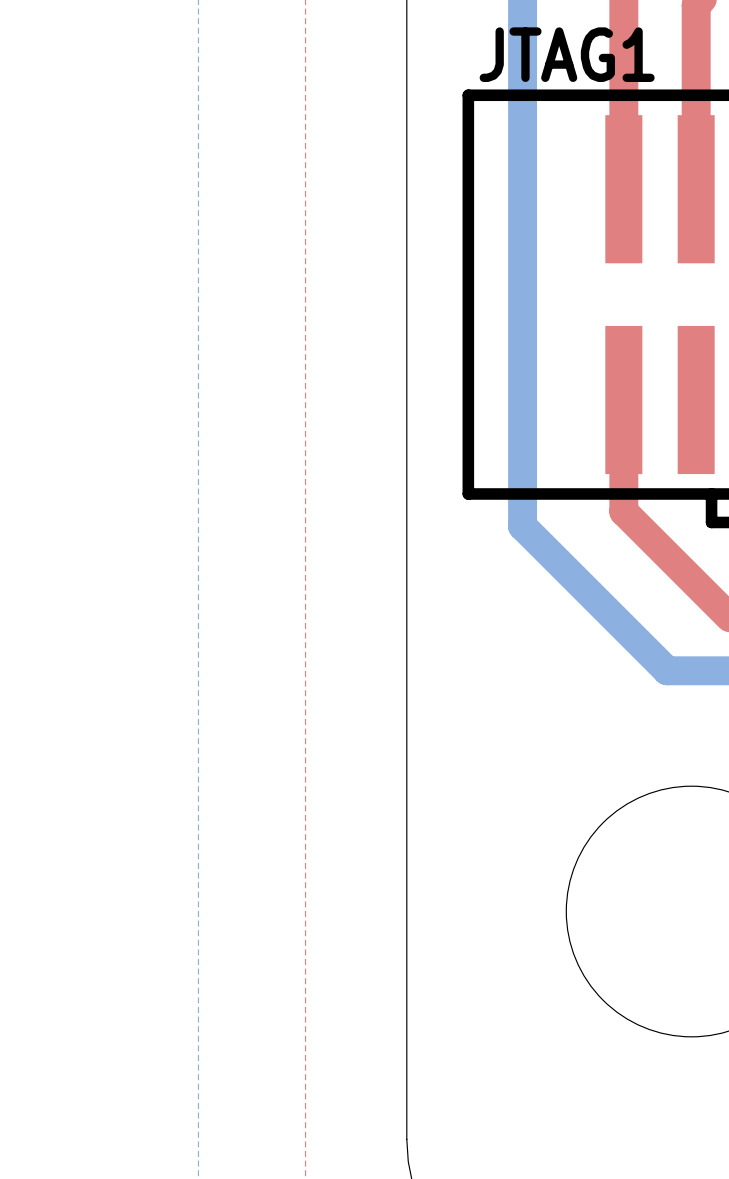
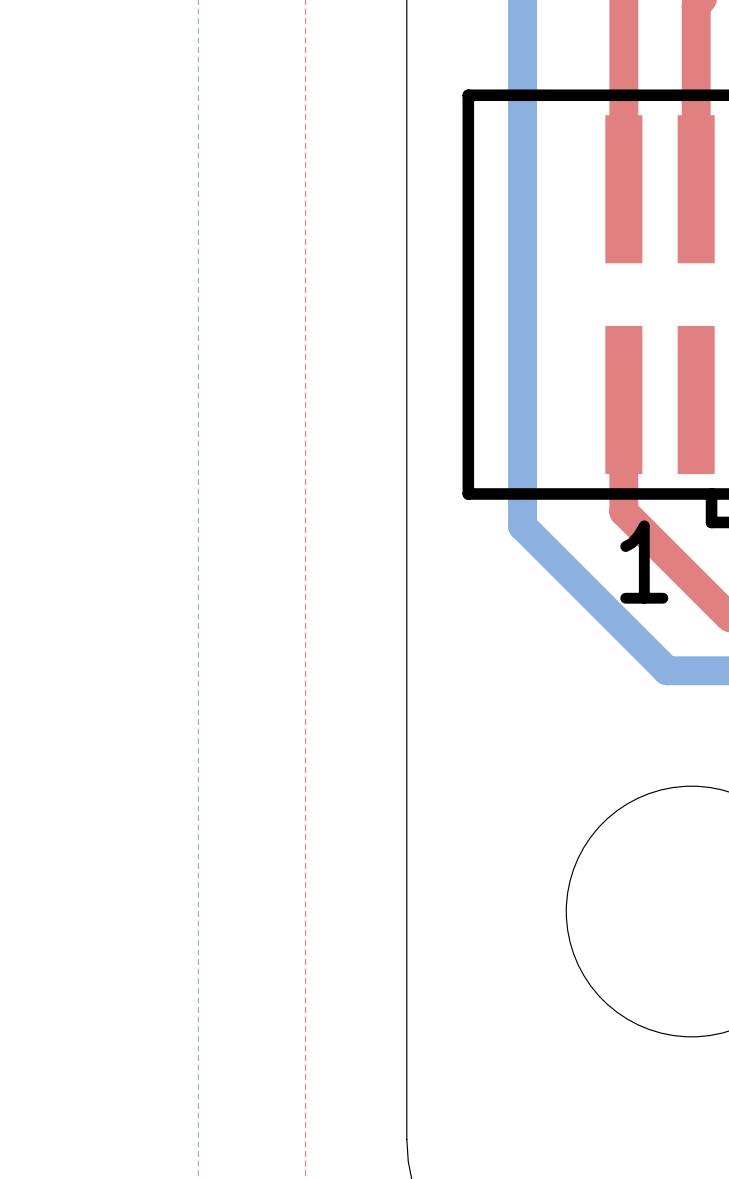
JTAG1 name: JTAG1 (567, 54) -> none
text: none -> 1 (644, 562)

